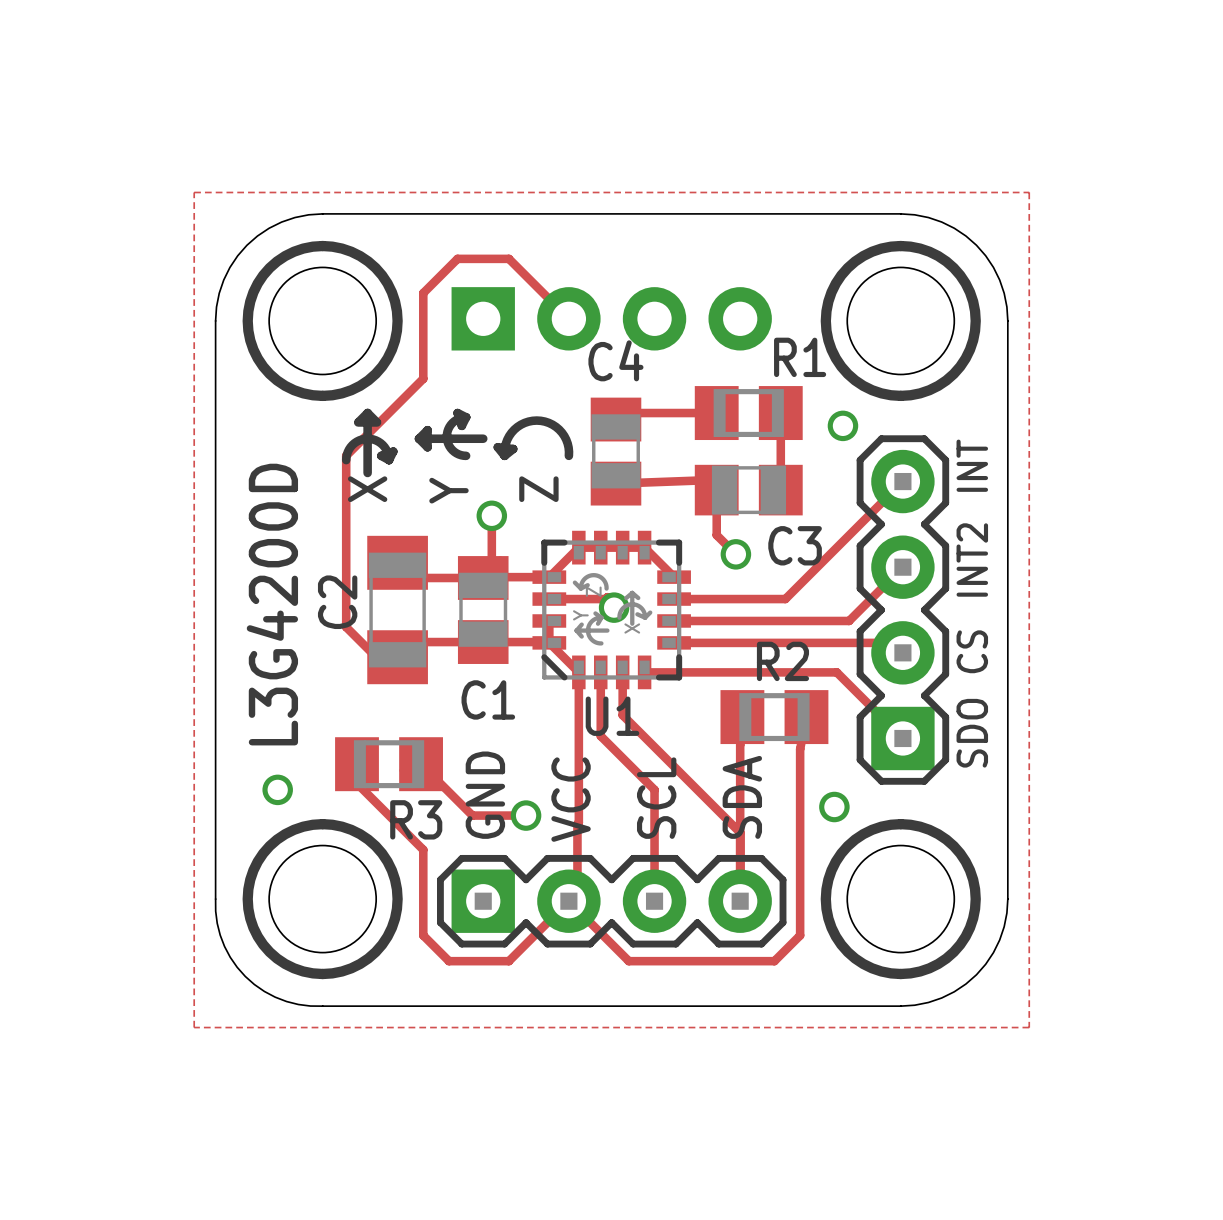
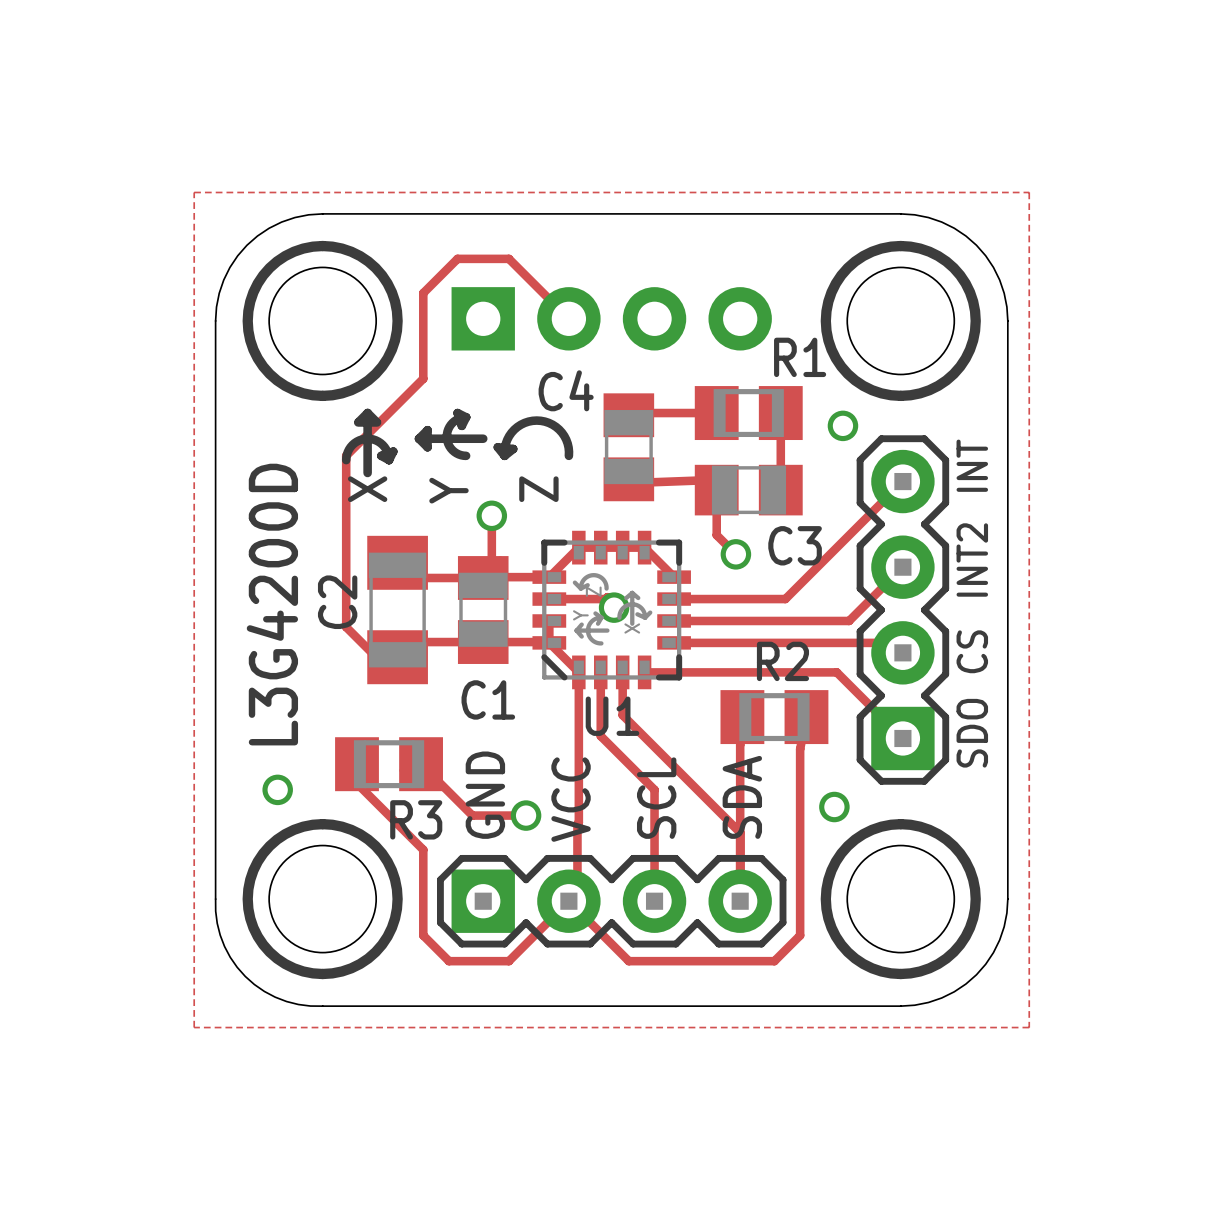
C4 name position: C4 (615, 360) -> C4 (566, 390)
C4 position: (616, 451) -> (628, 447)

